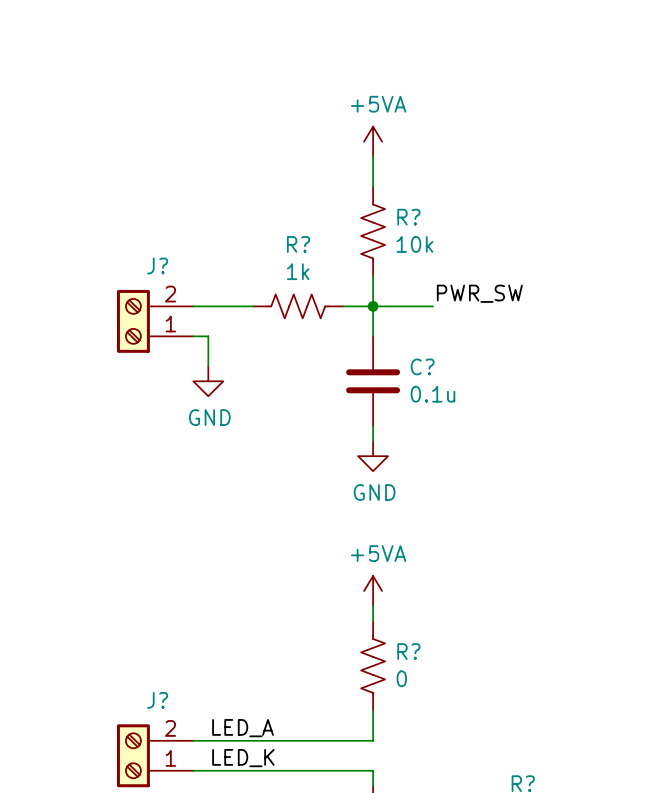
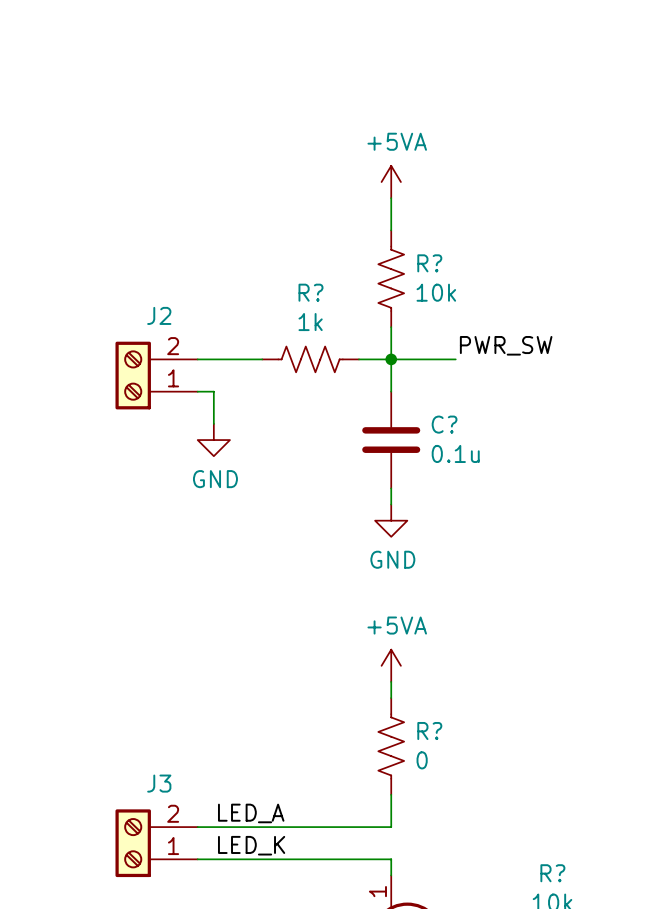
J? name: J? (157, 265) -> J2 (159, 315)
J? name: J? (157, 700) -> J3 (159, 783)

